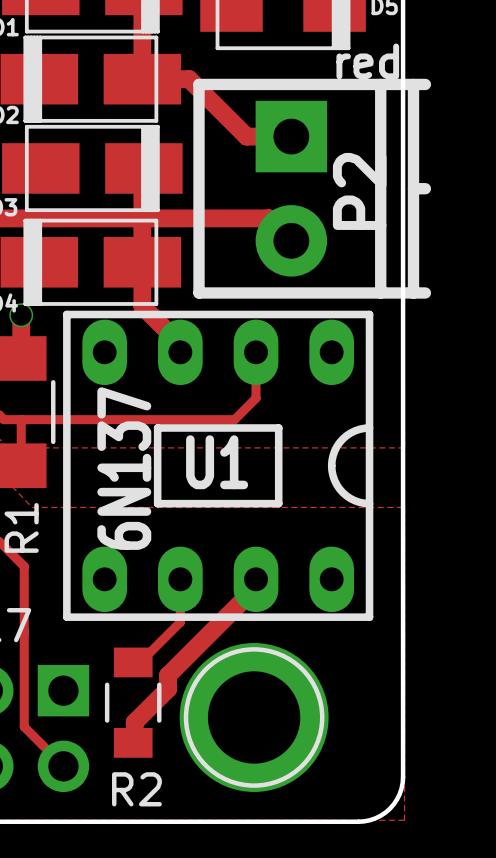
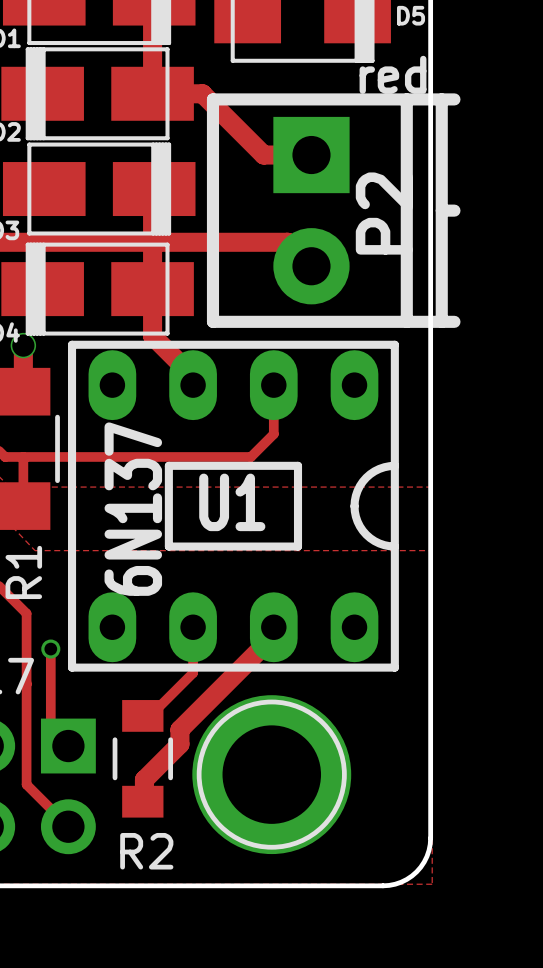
track: none -> (50, 649) (50, 728) (68, 746)
via: none -> (50, 649)

